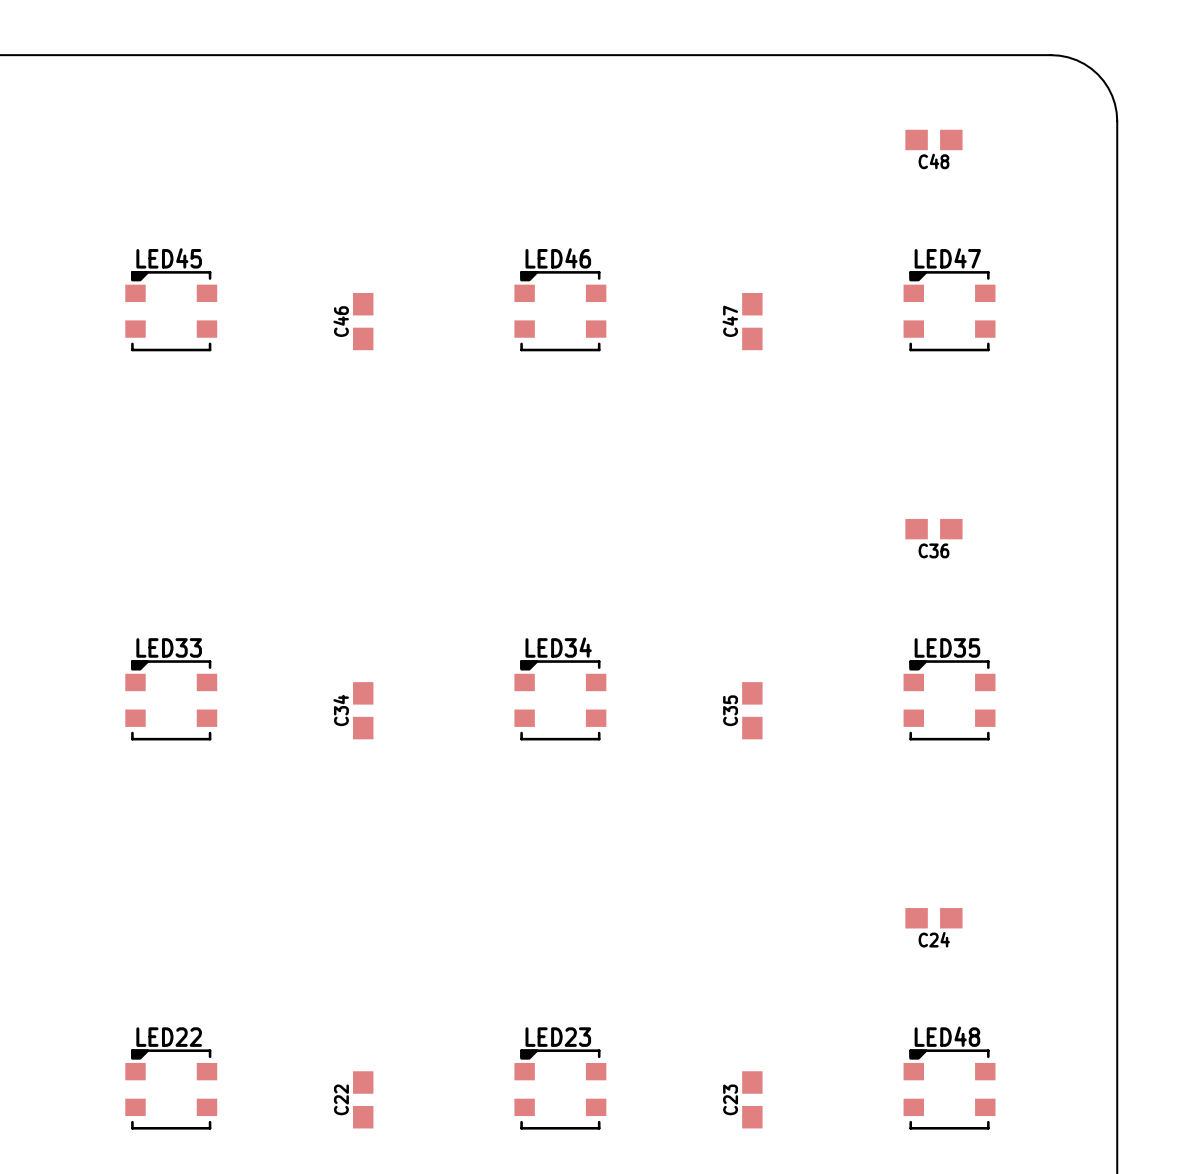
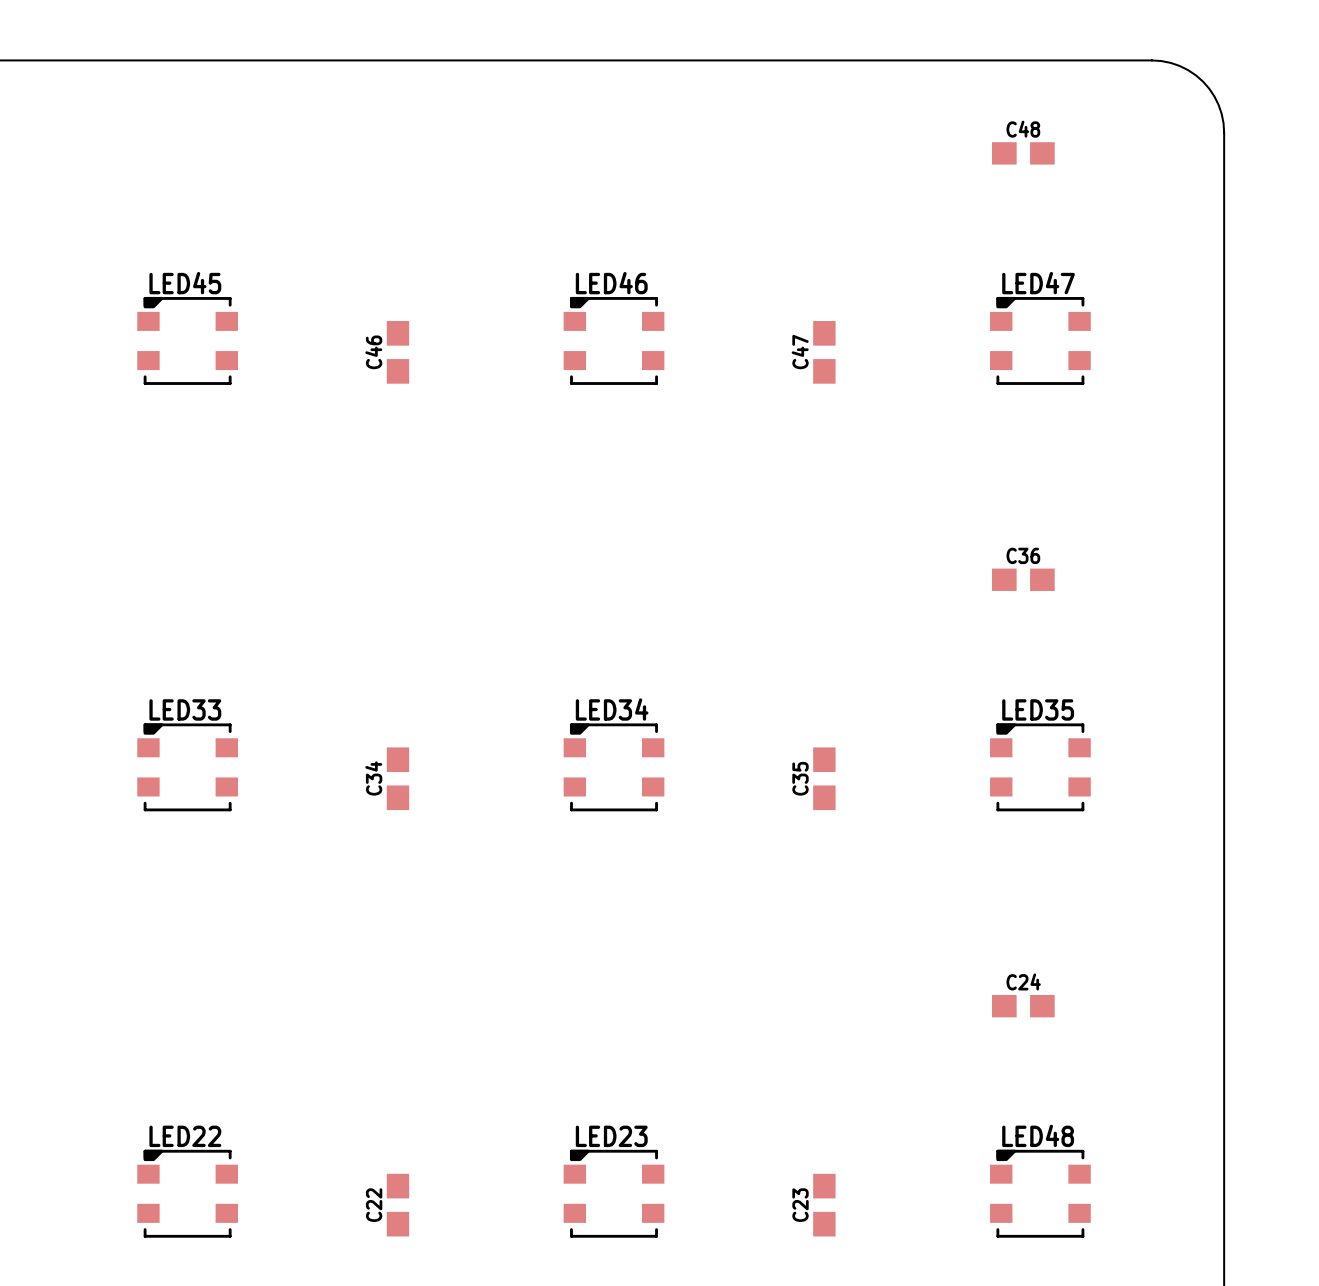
C48 name position: C48 (933, 161) -> C48 (1023, 129)
C36 name position: C36 (933, 550) -> C36 (1023, 555)
C24 name position: C24 (934, 939) -> C24 (1023, 981)

